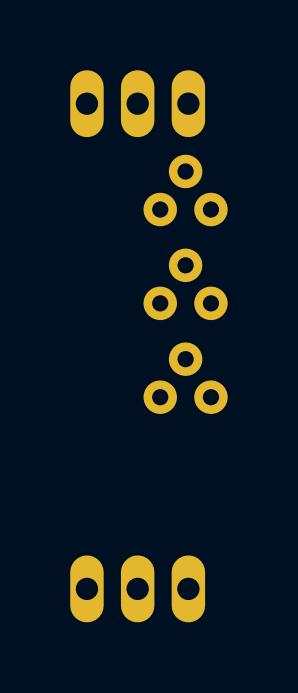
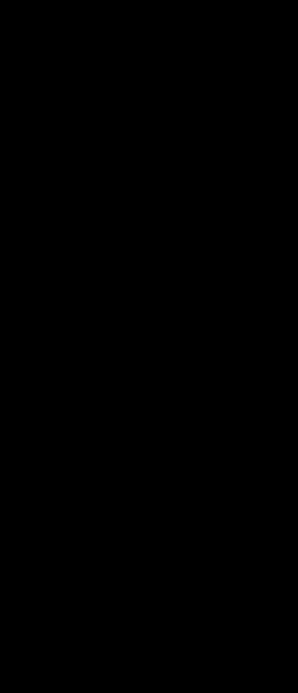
part: (137, 103) -> none
part: (185, 190) -> none
part: (185, 284) -> none
part: (185, 378) -> none
part: (137, 588) -> none

